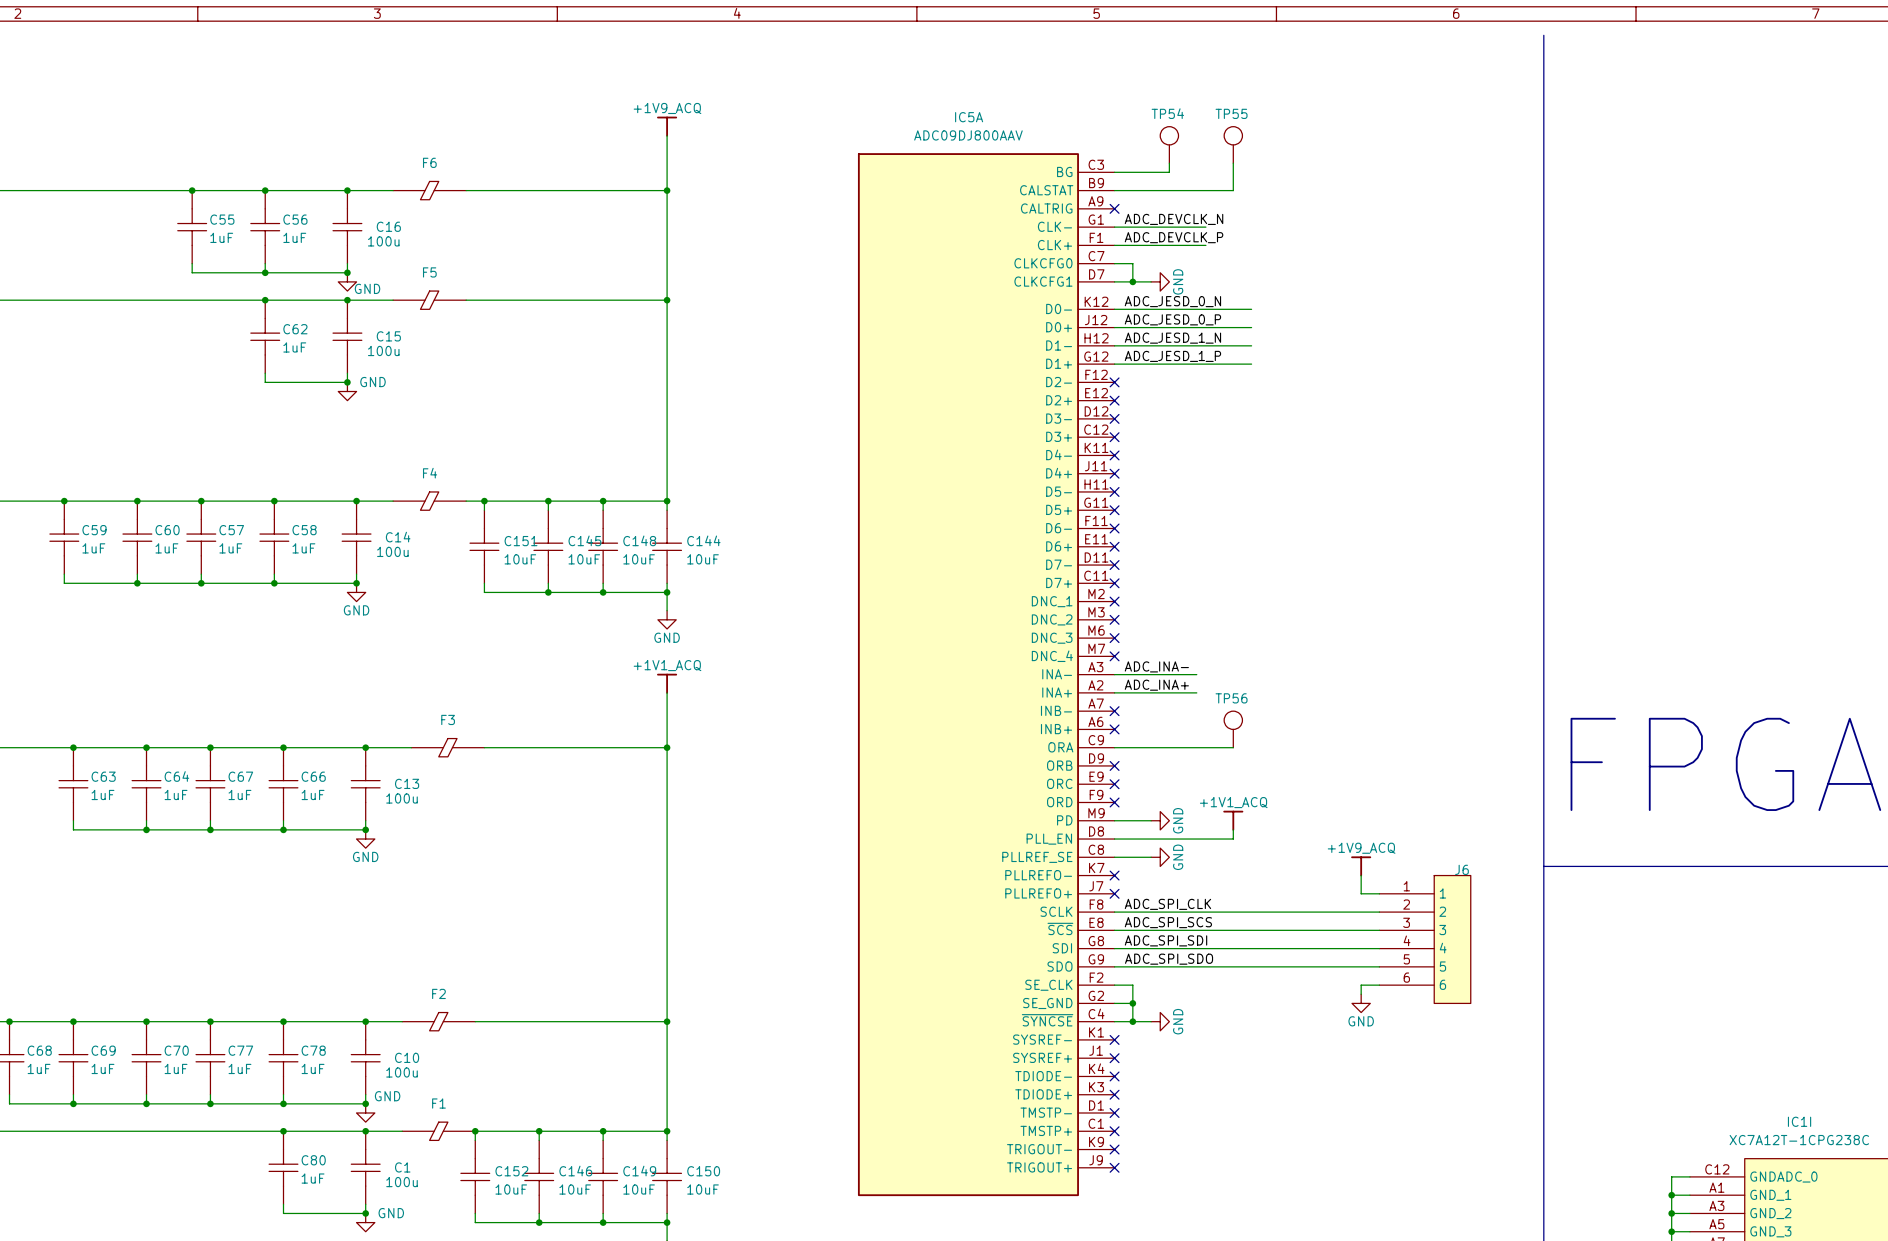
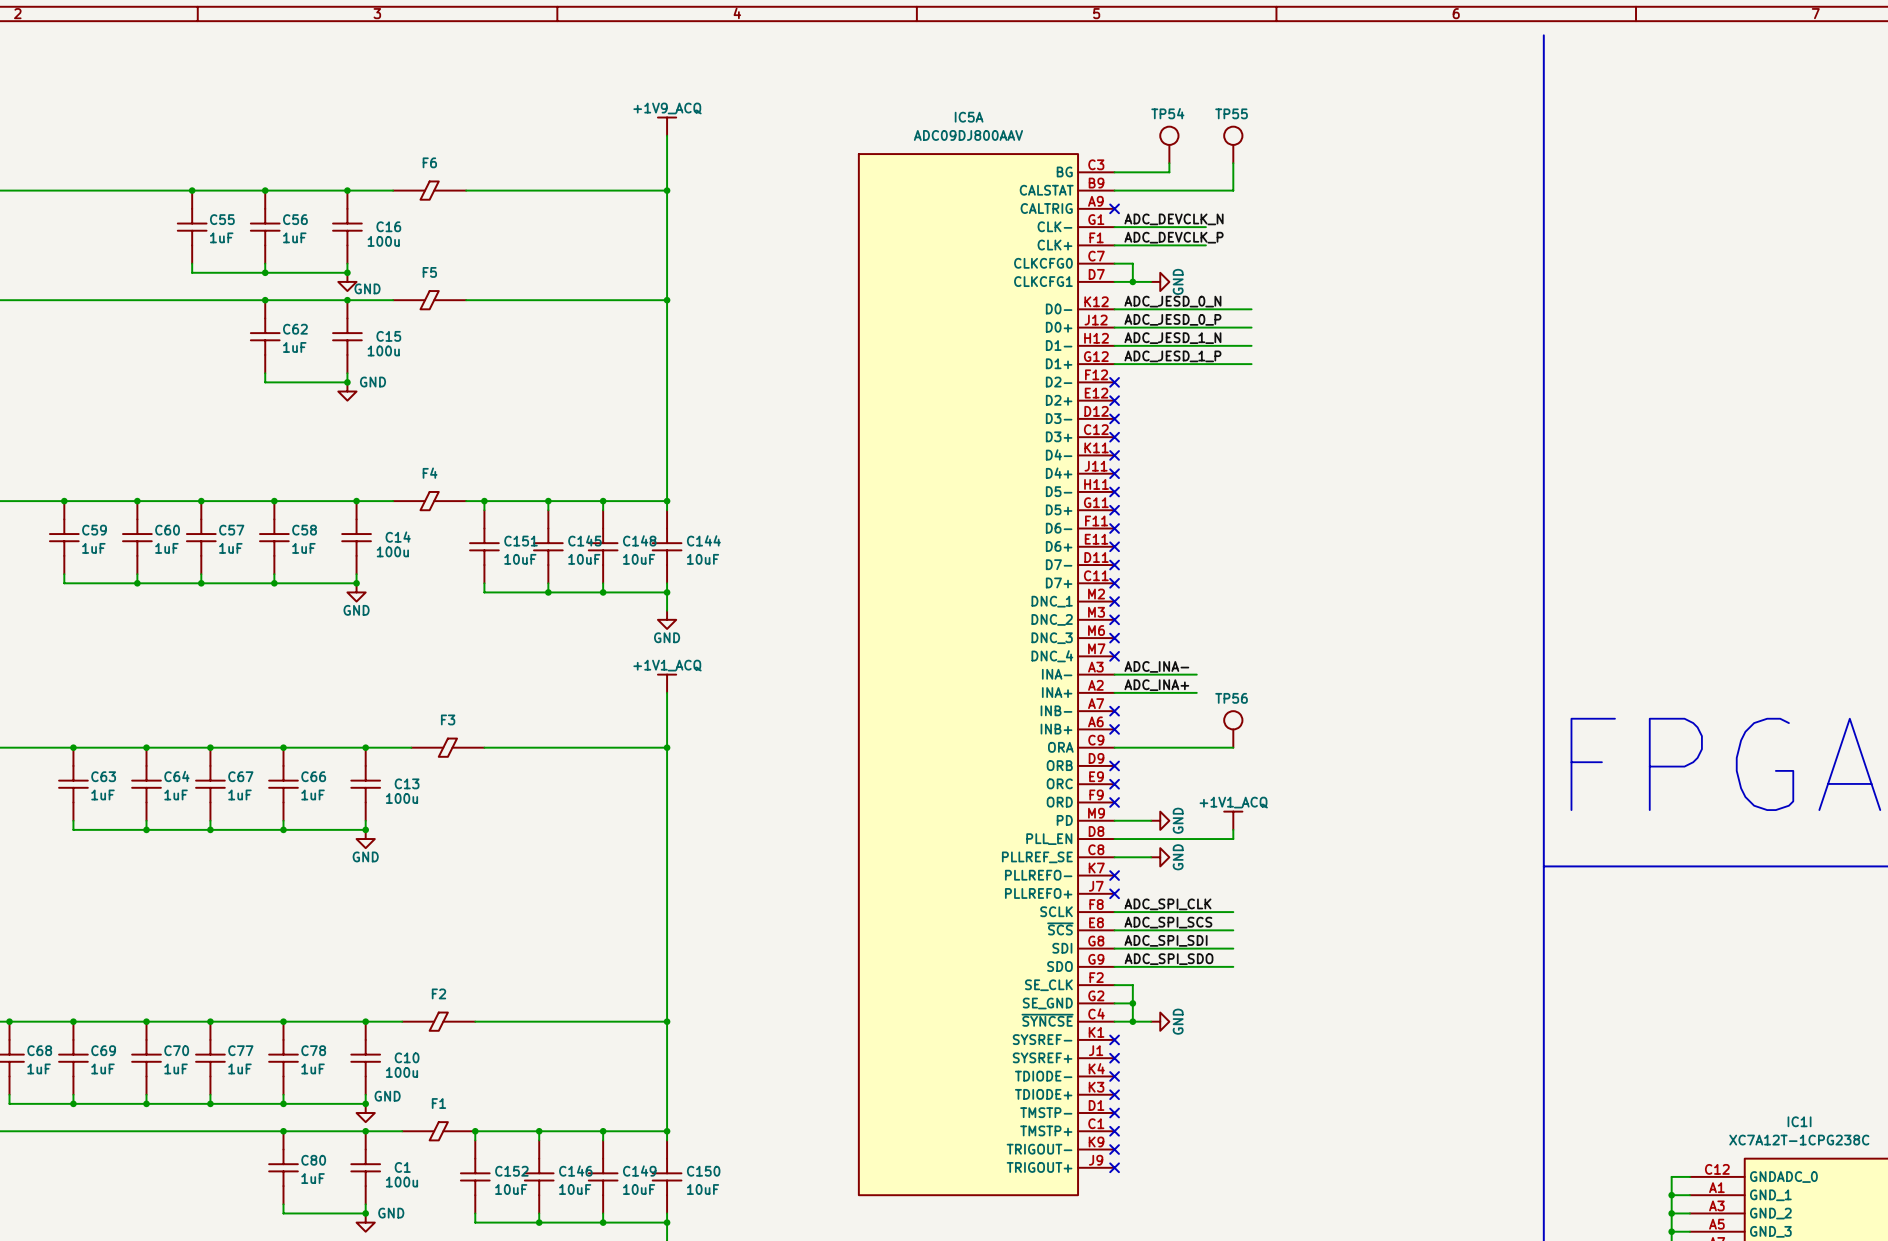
power symbol: +1V9_ACQ (1361, 866) -> none
wire: (1361, 875) (1361, 893) (1379, 893) -> none
wire: (1233, 912) (1379, 912) -> none
wire: (1233, 930) (1379, 930) -> none
J6: (1425, 939) -> none
wire: (1233, 948) (1379, 948) -> none
wire: (1233, 966) (1379, 966) -> none
wire: (1379, 985) (1361, 985) (1361, 994) -> none
power symbol: GND (1361, 1003) -> none

